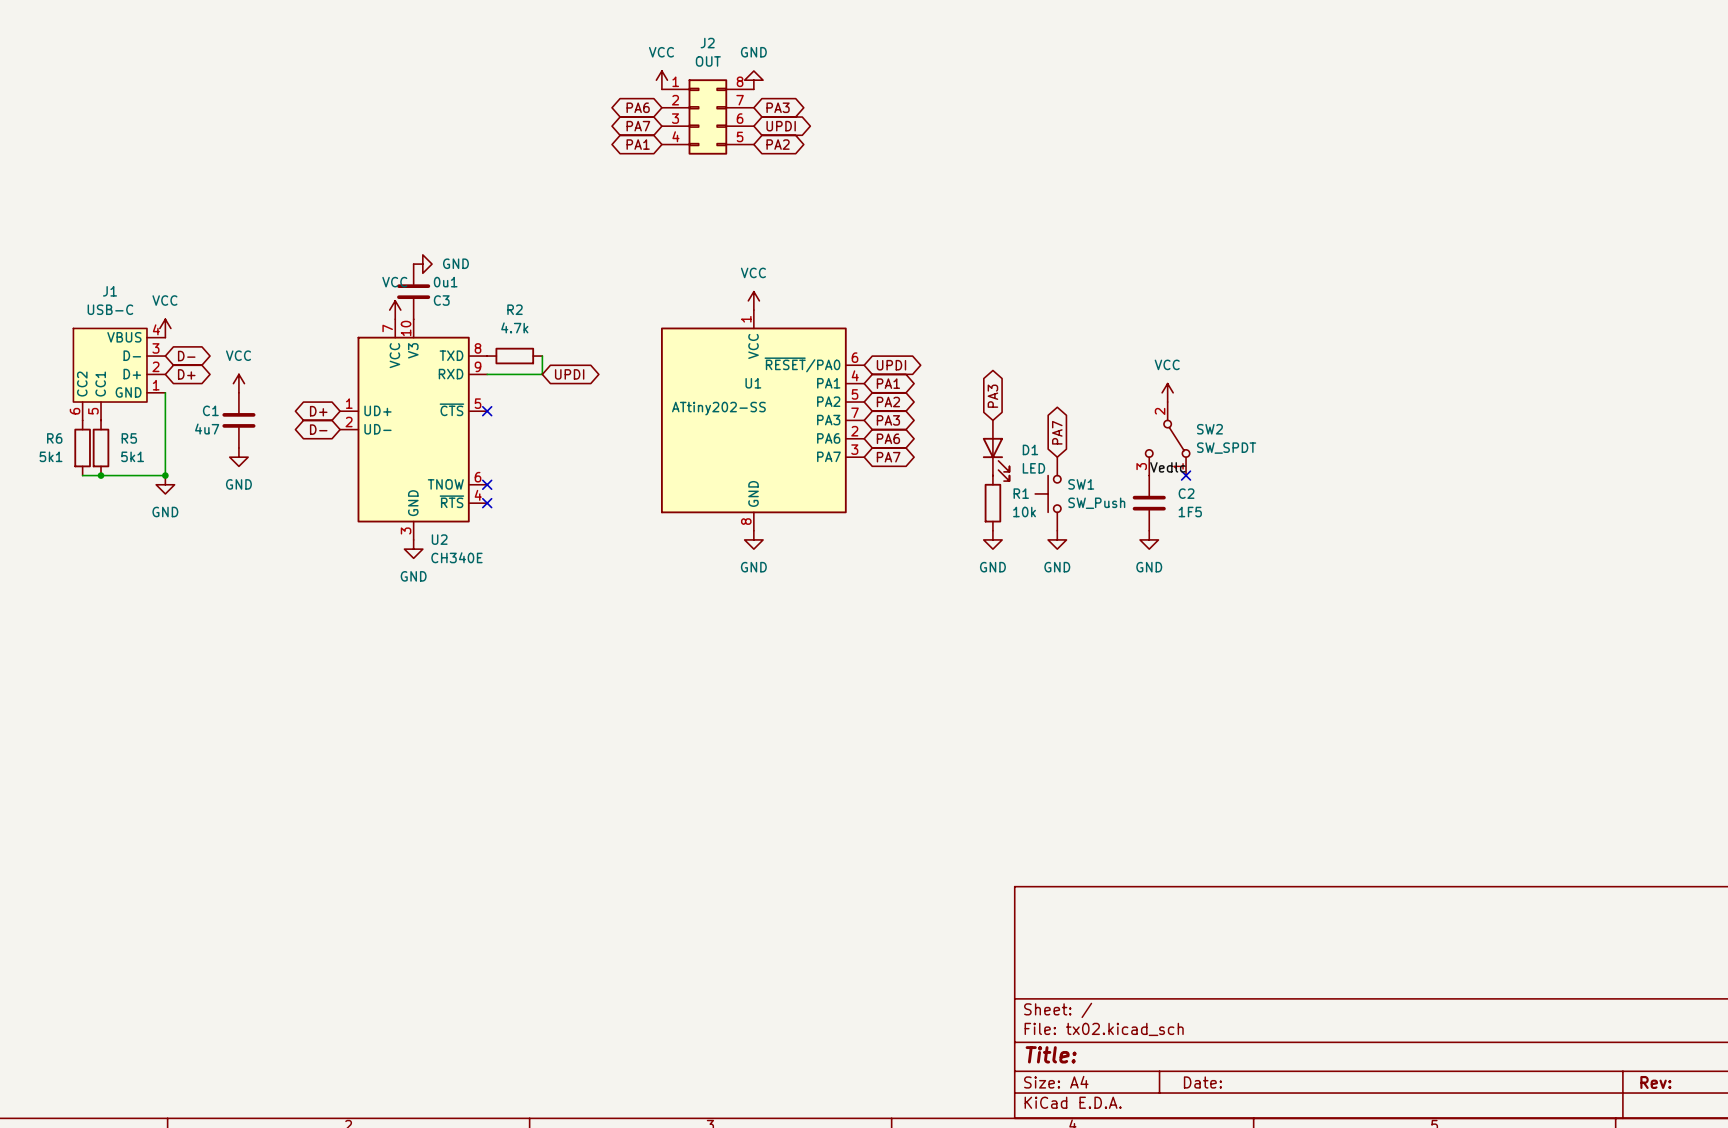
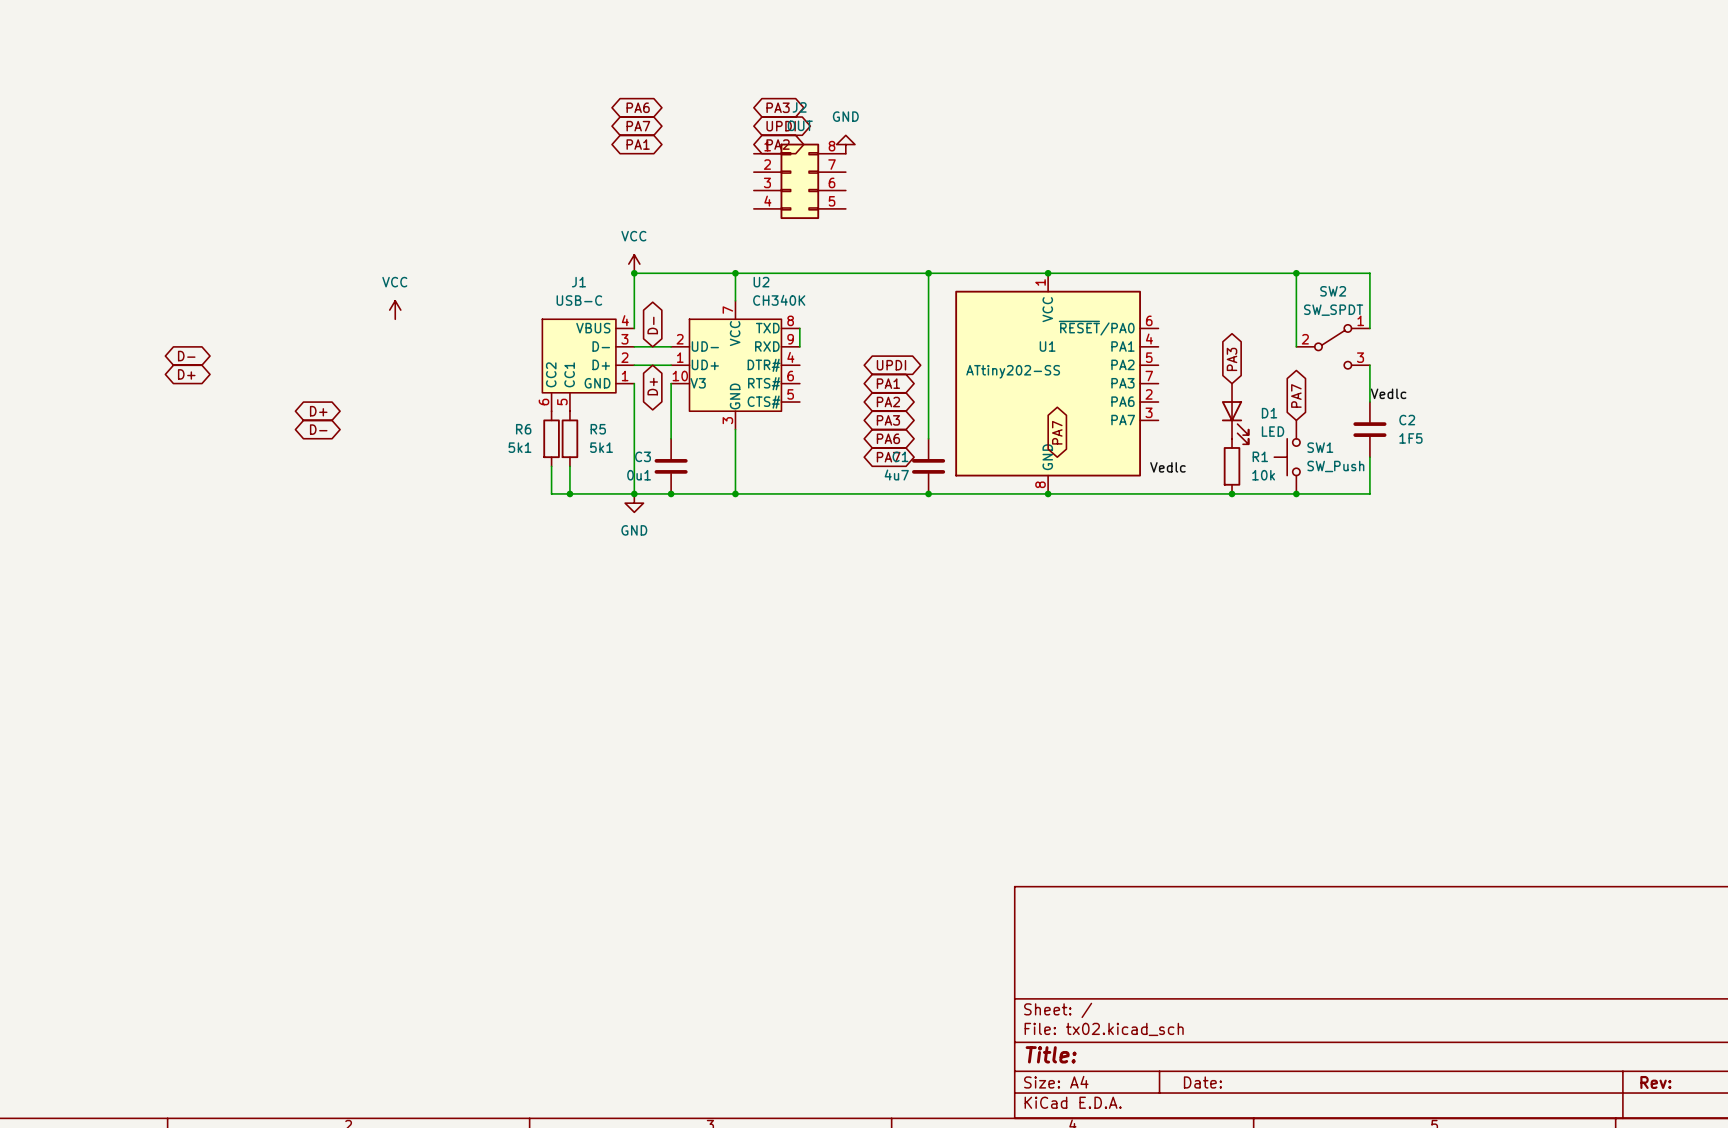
power symbol: VCC (661, 80) -> none
power symbol position: GND (753, 80) -> GND (845, 144)
J2 position: (707, 116) -> (799, 181)
power symbol: GND (422, 264) -> none
power symbol: none -> VCC (634, 264)
junction: none -> (634, 273)
wire: none -> (735, 273) (735, 300)
junction: none -> (735, 273)
wire: none -> (928, 273) (928, 438)
junction: none -> (928, 273)
junction: none -> (1048, 273)
wire: none -> (1296, 273) (1296, 346)
junction: none -> (1296, 273)
C3 value position: 0u1 (445, 282) -> 0u1 (639, 475)
C3 position: (413, 291) -> (671, 466)
C3 name position: C3 (441, 300) -> C3 (643, 456)
power symbol: VCC (753, 300) -> none
U2 symbol: [340, 319, 488, 540] -> [671, 300, 800, 430]
global label: none -> D- (652, 325)
power symbol: VCC (165, 328) -> none
wire: none -> (634, 328) (634, 273) (1369, 273) (1369, 328)
wire: none -> (634, 346) (671, 346)
R2: 4.7k (514, 356) -> none
wire: (542, 356) (542, 374) (487, 374) -> none
global label: none -> PA3 (1232, 359)
wire: none -> (634, 365) (671, 365)
wire: none -> (1369, 365) (1369, 402)
J1 position: (119, 374) -> (588, 365)
global label: UPDI (569, 374) -> none
power symbol: VCC (238, 383) -> none
wire: none -> (634, 383) (634, 493)
global label: none -> D+ (652, 386)
wire: (165, 392) (165, 475) (82, 475) -> none
power symbol: VCC (1167, 392) -> none
label: none -> Vedlc (1388, 393)
global label: none -> PA7 (1296, 395)
global label: PA3 (992, 396) -> none
no-connect mark: (487, 411) -> none
C1 position: (238, 420) -> (928, 466)
U1 position: (762, 420) -> (1056, 383)
SW2 rotation: 0° (1167, 438) -> 90° counterclockwise (1333, 346)
SW2 position: (1167, 438) -> (1333, 346)
R6 position: (82, 447) -> (551, 438)
R5 position: (101, 447) -> (569, 438)
SW2 value position: SW_SPDT (1226, 448) -> SW_SPDT (1333, 310)
D1 position: (996, 450) -> (1235, 413)
power symbol: GND (238, 457) -> none
wire: none -> (1369, 457) (1369, 493) (551, 493) (551, 466)
wire: none -> (569, 466) (569, 493)
junction: (101, 475) -> none
junction: (165, 475) -> none
no-connect mark: (1186, 475) -> none
power symbol: GND (165, 484) -> none
no-connect mark: (487, 484) -> none
junction: none -> (569, 493)
junction: none -> (634, 493)
junction: none -> (671, 493)
junction: none -> (735, 493)
junction: none -> (928, 493)
junction: none -> (1048, 493)
SW1 position: (1048, 493) -> (1287, 457)
junction: none -> (1232, 493)
junction: none -> (1296, 493)
no-connect mark: (487, 503) -> none
power symbol: none -> GND (634, 503)
R1 position: (992, 503) -> (1232, 466)
C2 position: (1149, 503) -> (1369, 429)
U2 name position: U2 (439, 539) -> U2 (761, 282)
power symbol: GND (753, 539) -> none
power symbol: GND (992, 539) -> none
power symbol: GND (1057, 539) -> none
power symbol: GND (1149, 539) -> none
power symbol: GND (413, 549) -> none
U2 value: CH340E (456, 557) -> CH340K (779, 300)

